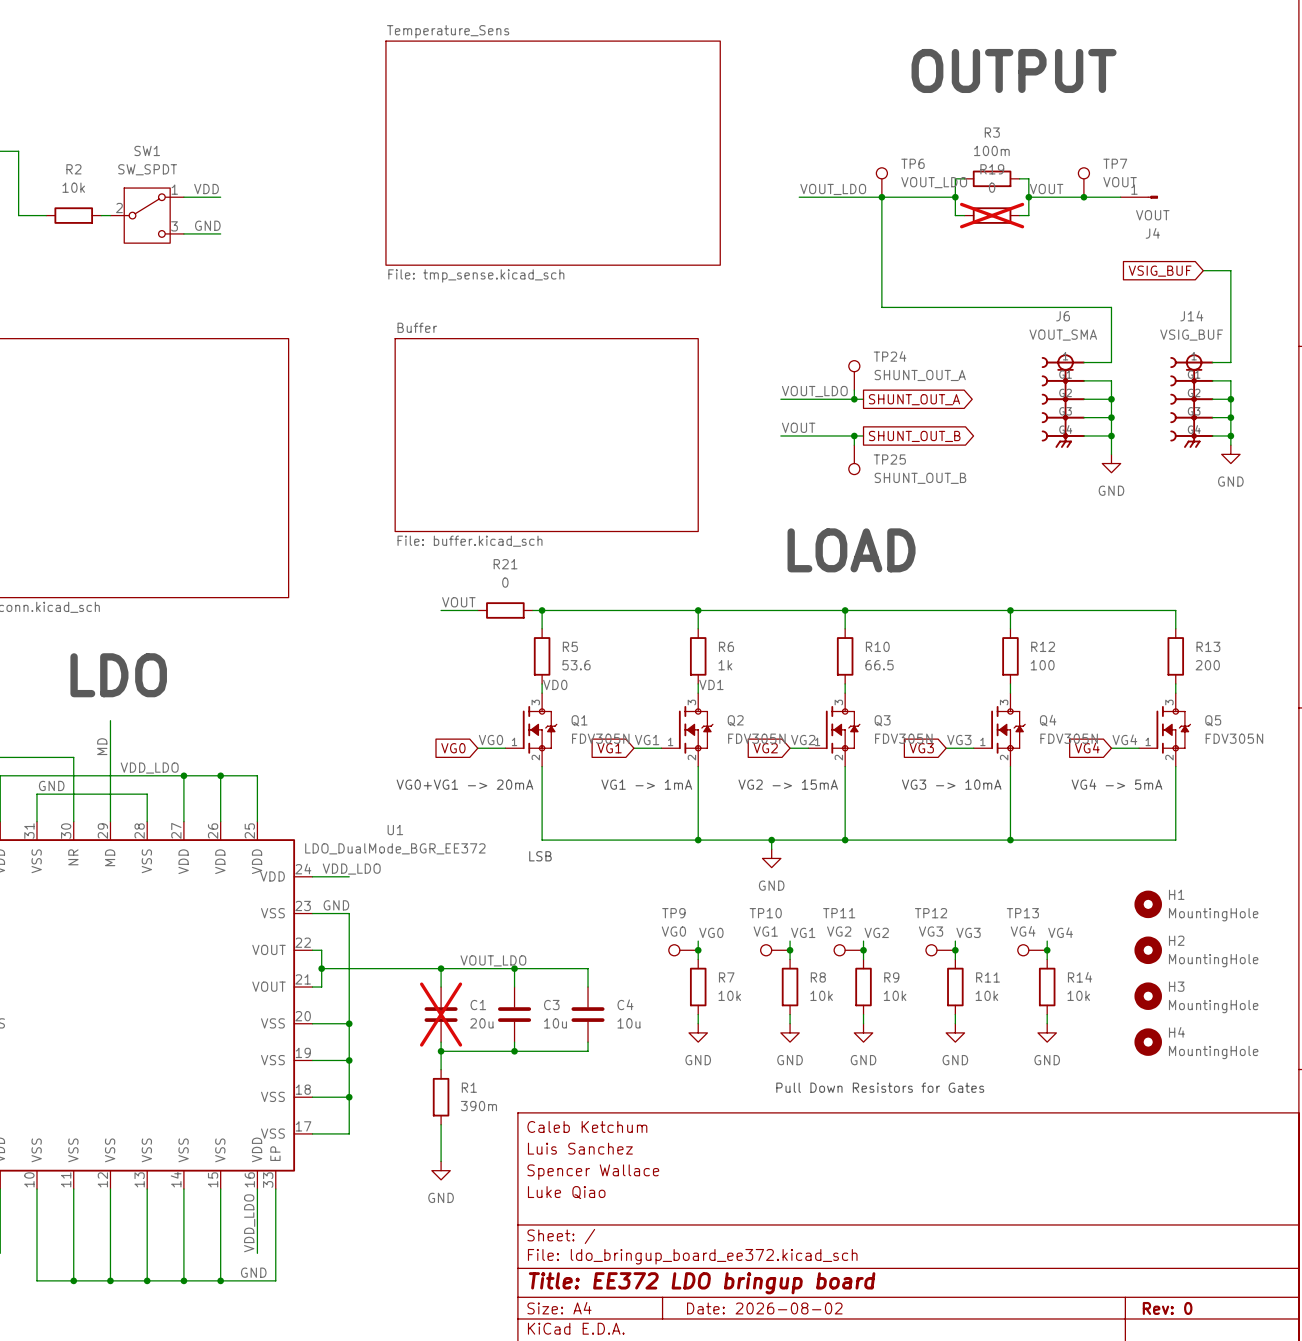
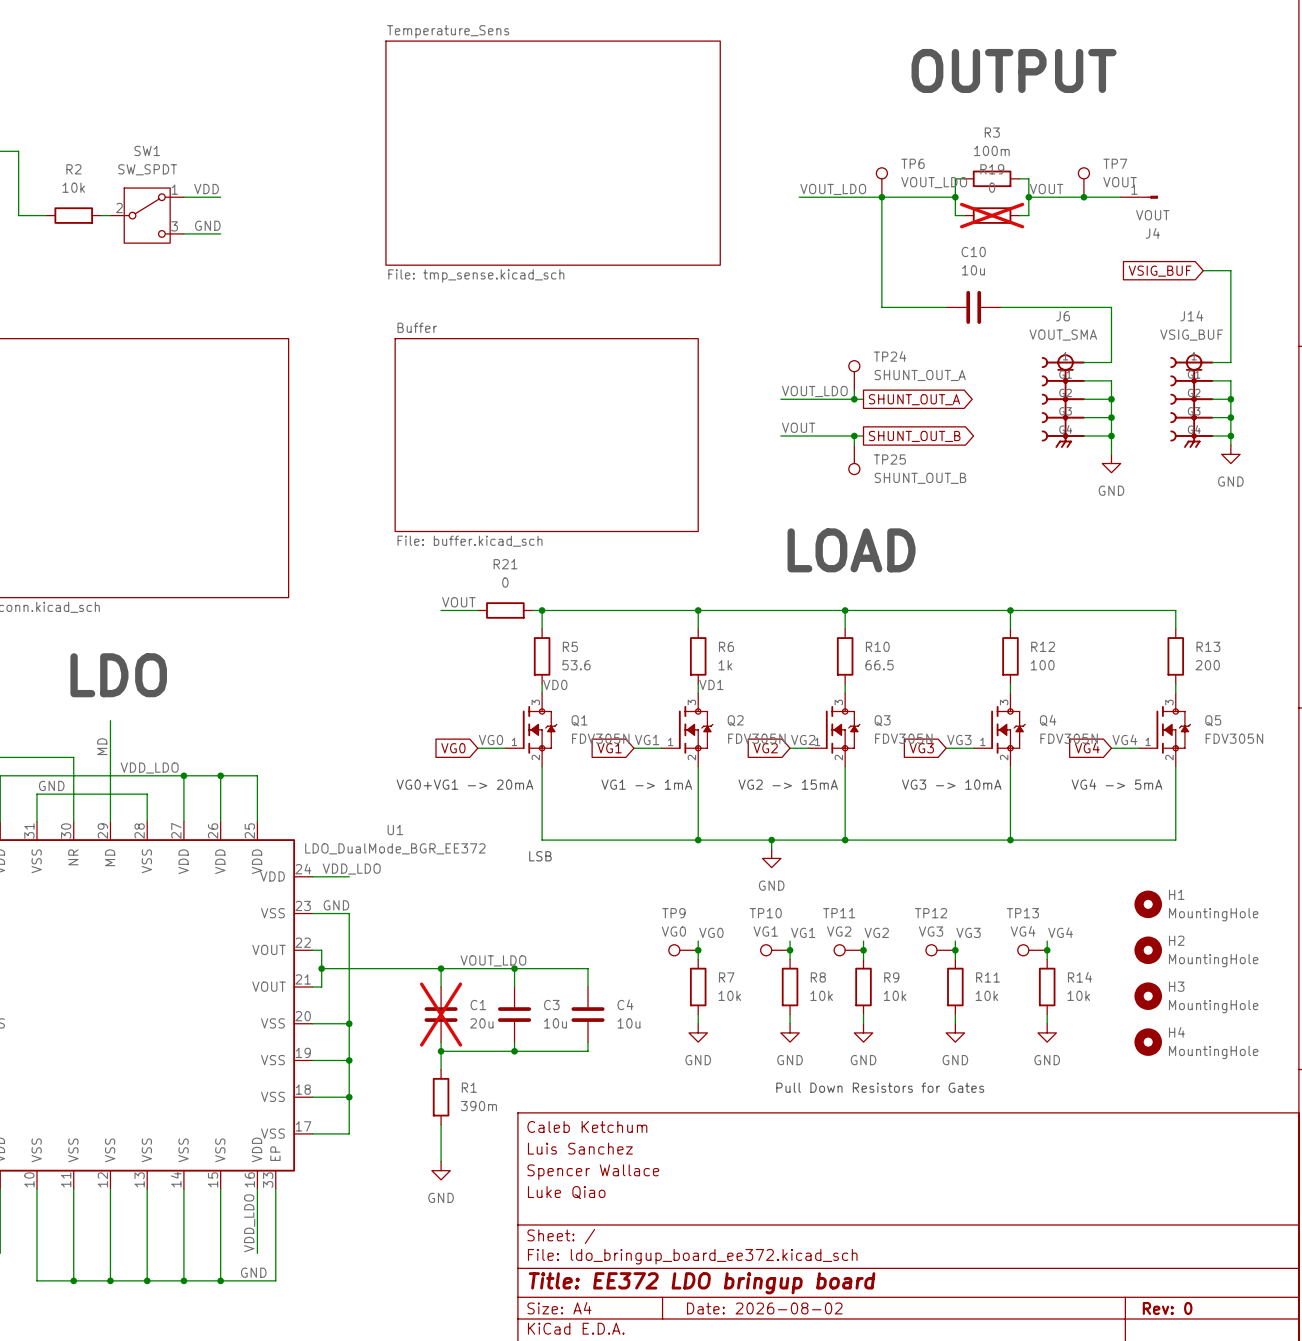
C10: none -> 10u (973, 307)

